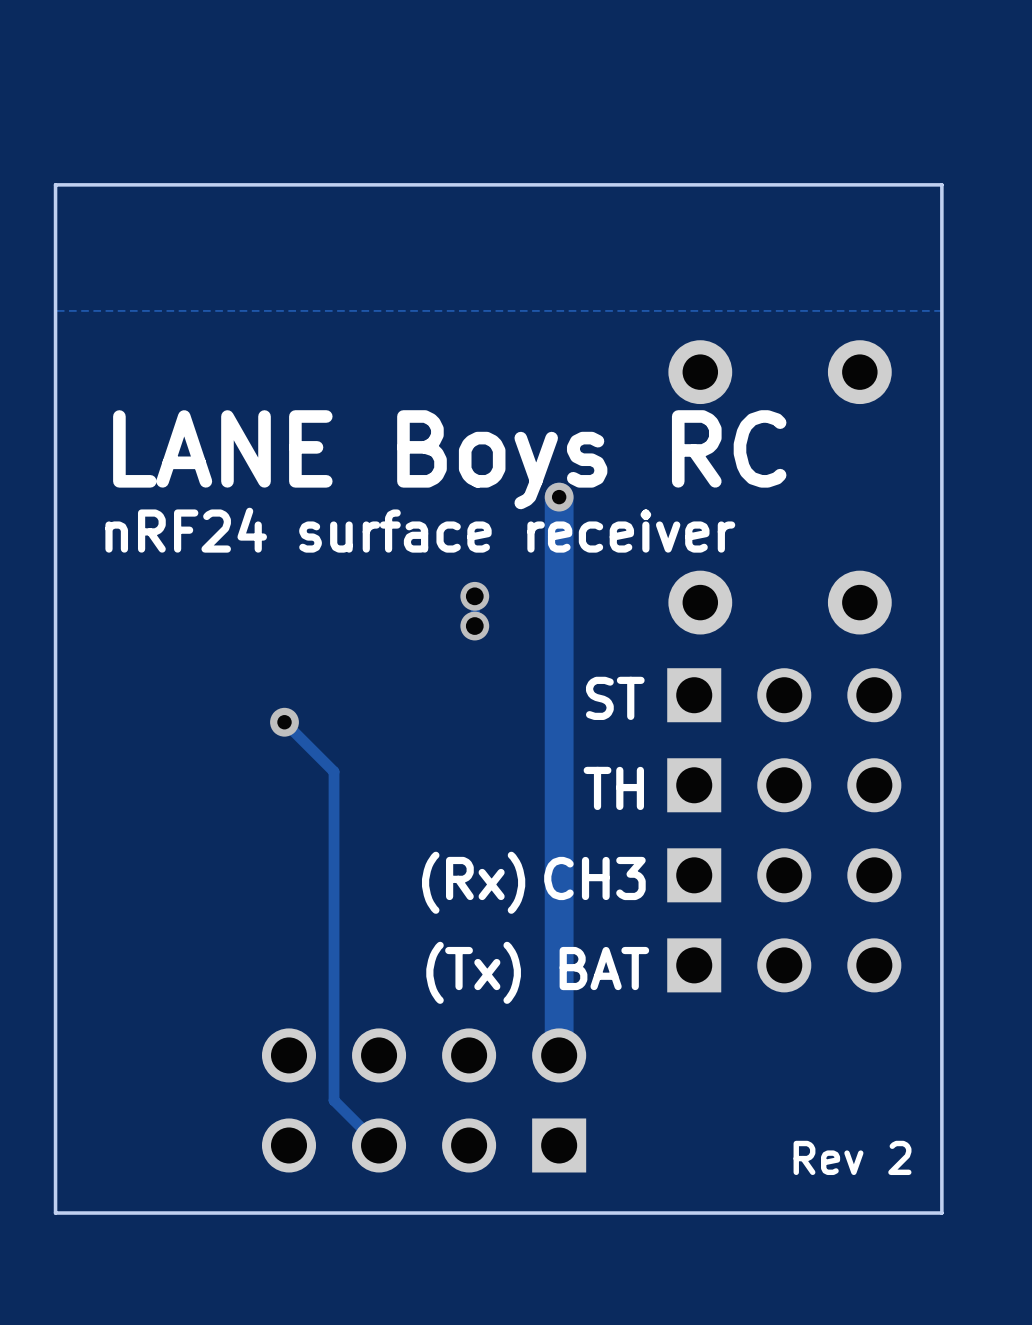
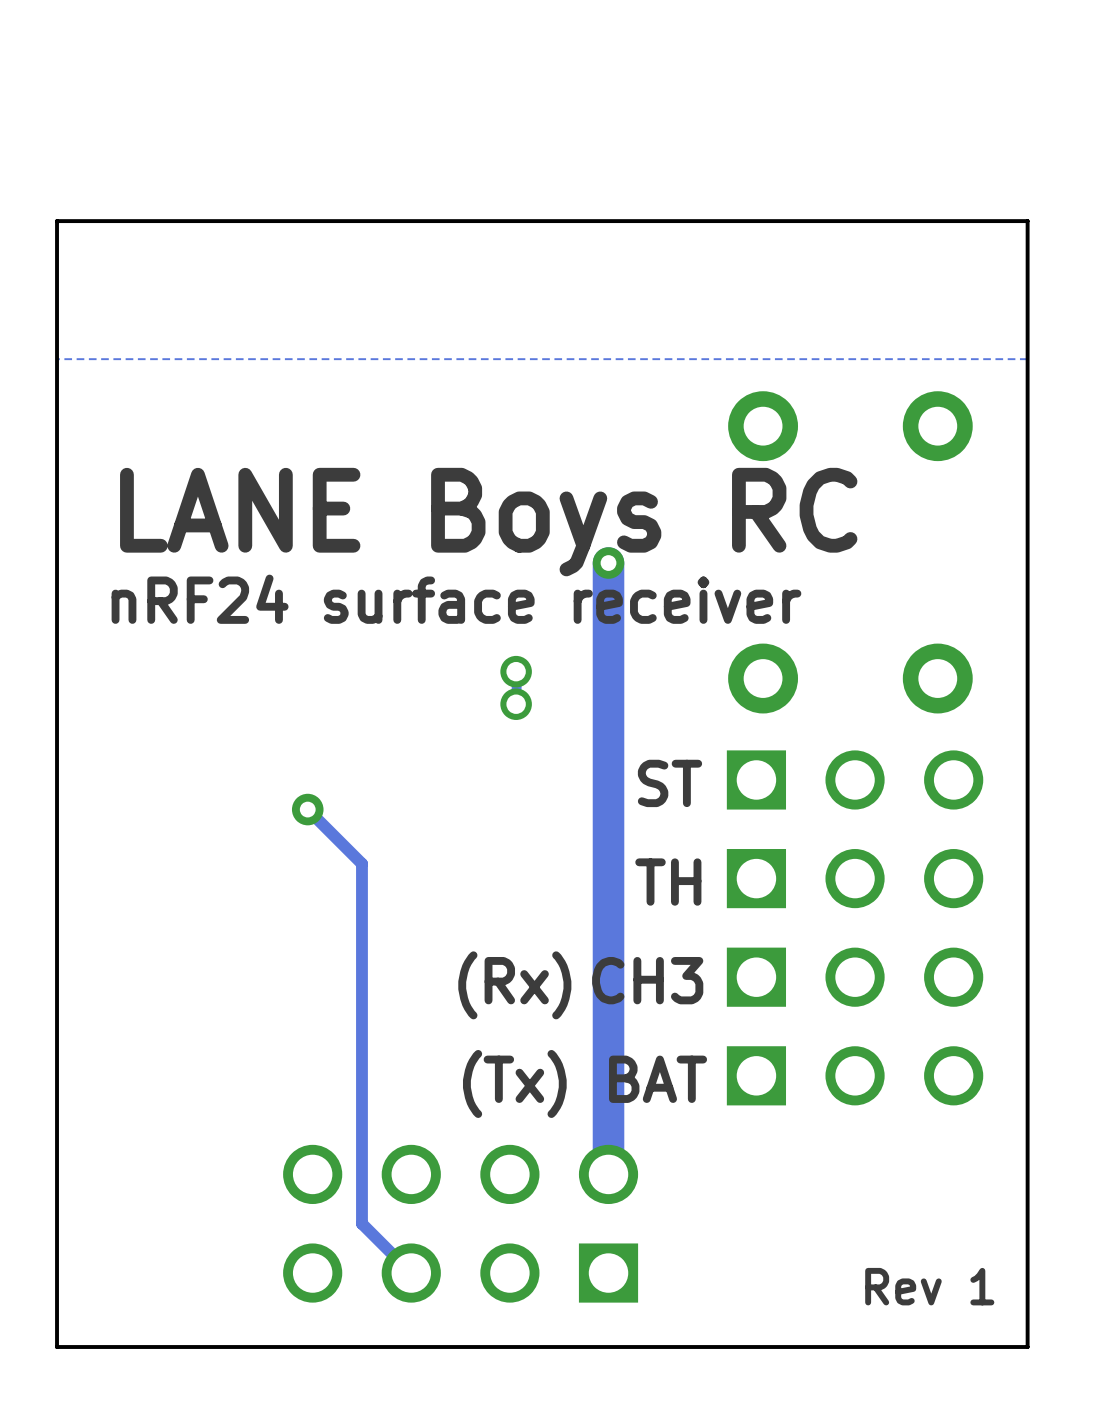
text: Rev 2 (852, 1157) -> Rev 1 (929, 1286)

